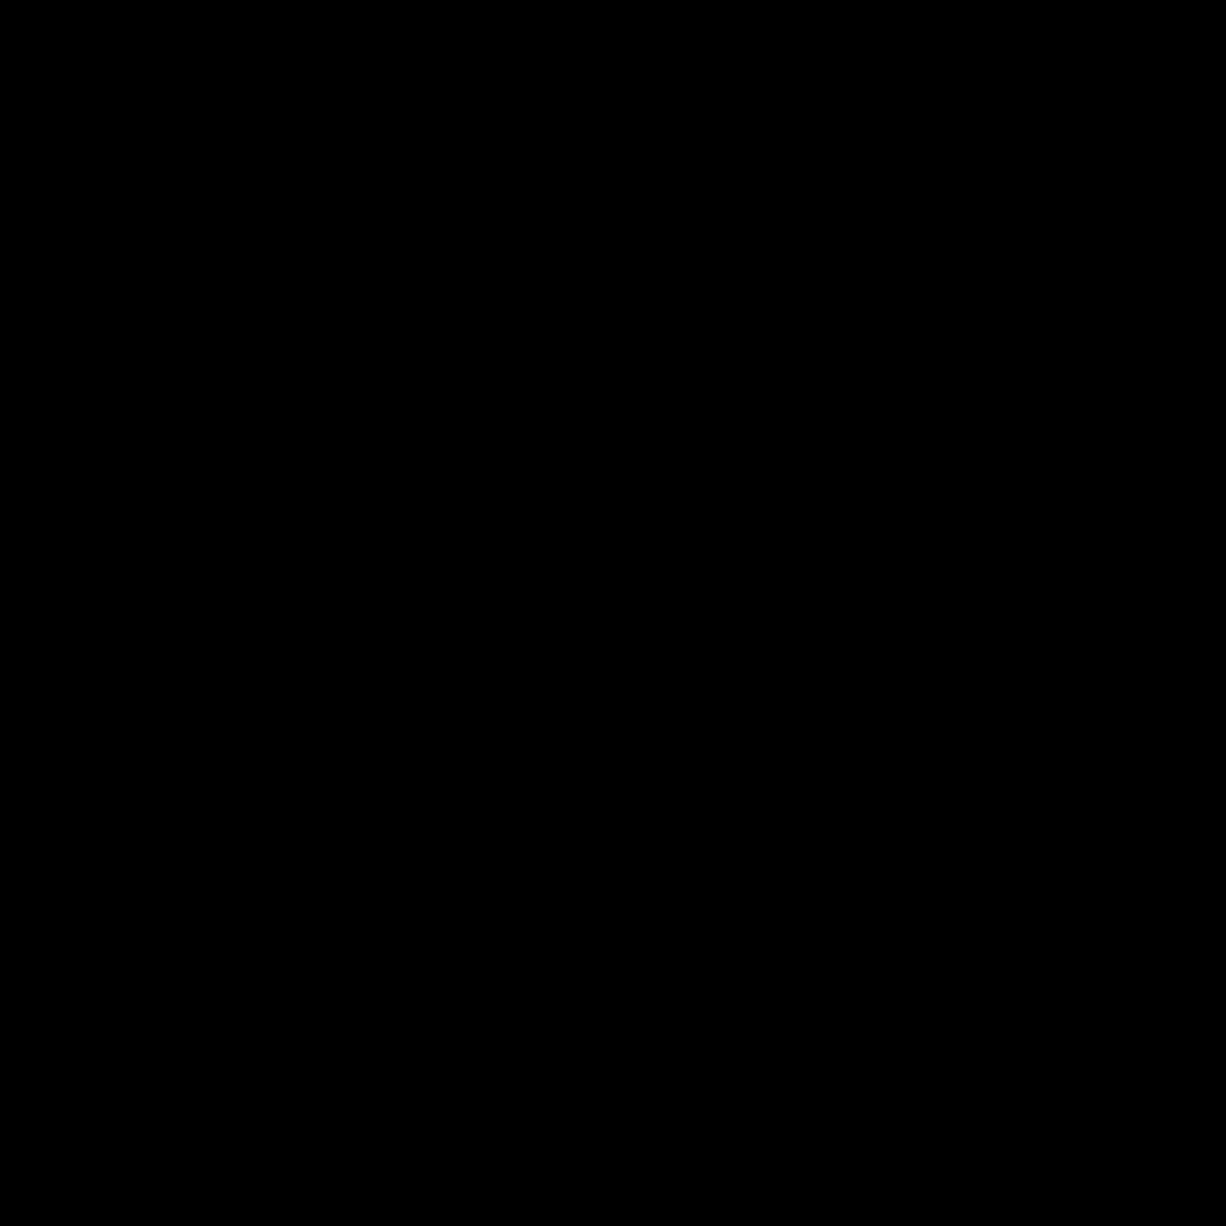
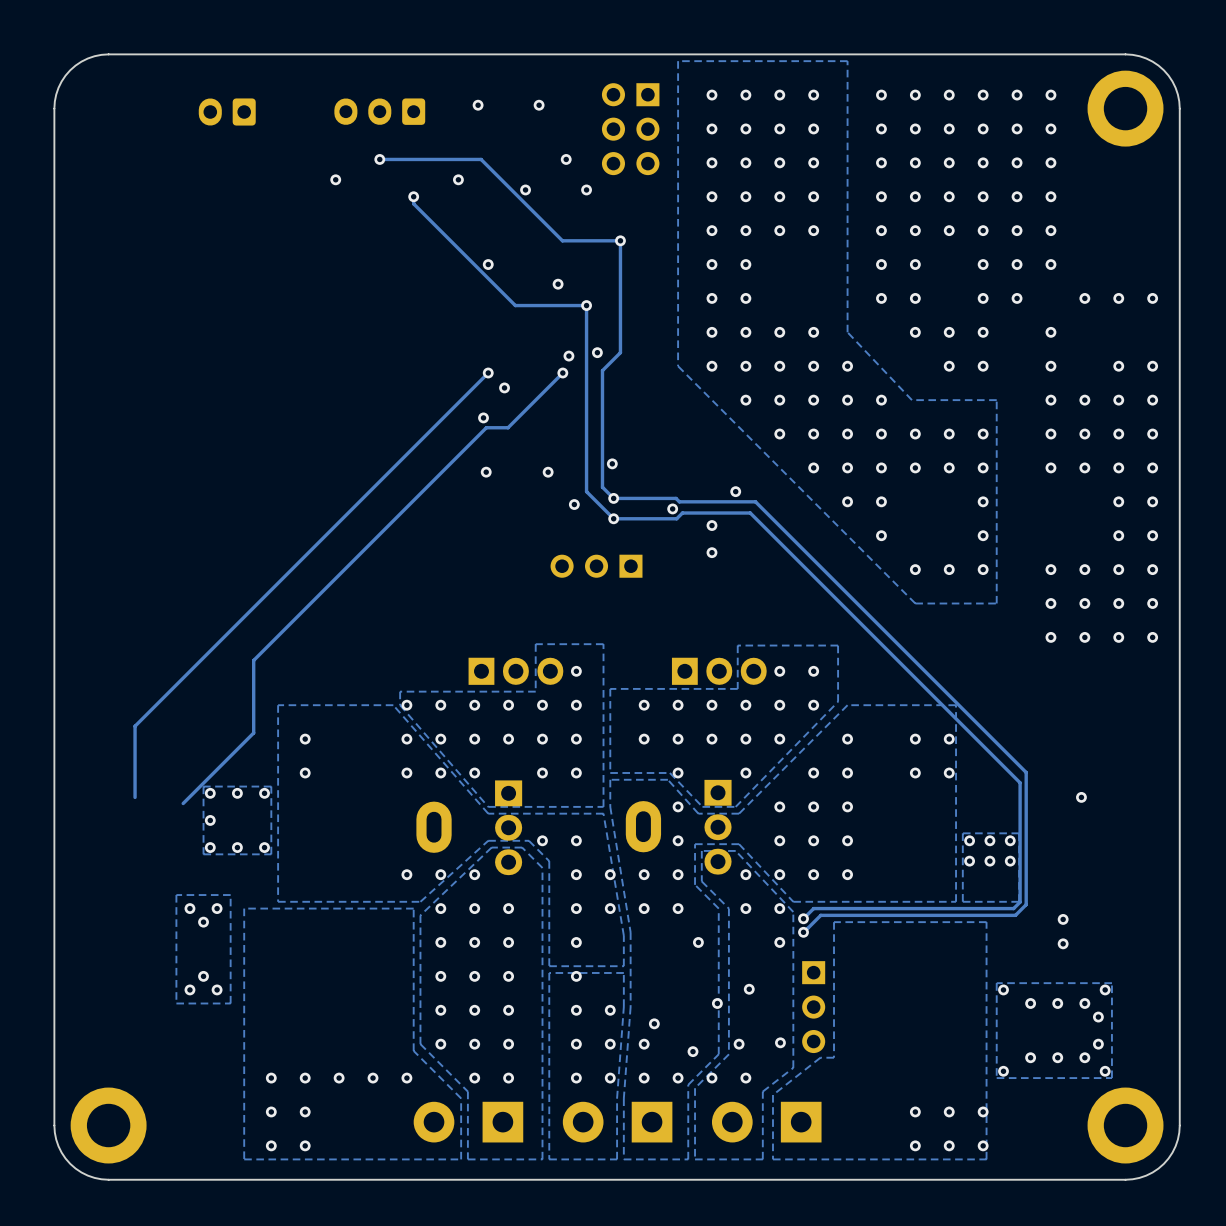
board edge: none -> (1125, 54) (108, 54) (87, 58) (70, 70) (58, 87) (54, 108) (54, 1125) (58, 1146) (70, 1163) (87, 1175) (108, 1179) (1125, 1179) (1146, 1175) (1163, 1163) (1175, 1146) (1179, 1125) (1179, 108) (1175, 87) (1163, 70) (1146, 58) (1125, 54)
zone outline: none -> (847, 61) (847, 332) (911, 400) (996, 400) (996, 603) (915, 603) (678, 366) (678, 61) (847, 61)
via: none -> (711, 95)
via: none -> (745, 95)
via: none -> (779, 95)
via: none -> (813, 95)
via: none -> (881, 95)
via: none -> (915, 95)
via: none -> (949, 95)
via: none -> (983, 95)
via: none -> (1017, 95)
via: none -> (1050, 95)
via: none -> (478, 105)
via: none -> (539, 105)
part: none -> (1125, 108)
part: none -> (379, 111)
part: none -> (227, 112)
via: none -> (711, 128)
via: none -> (745, 128)
via: none -> (779, 128)
via: none -> (813, 128)
via: none -> (881, 128)
via: none -> (915, 128)
via: none -> (949, 128)
via: none -> (983, 128)
via: none -> (1017, 128)
via: none -> (1050, 128)
part: none -> (630, 129)
track: none -> (379, 159) (481, 159) (562, 240) (620, 240) (620, 352) (602, 370) (602, 487) (613, 498) (676, 498) (679, 501) (755, 501) (1026, 772) (1026, 904) (1015, 915) (820, 915) (803, 932)
via: none -> (379, 159)
via: none -> (566, 159)
via: none -> (711, 162)
via: none -> (745, 162)
via: none -> (779, 162)
via: none -> (813, 162)
via: none -> (881, 162)
via: none -> (915, 162)
via: none -> (949, 162)
via: none -> (983, 162)
via: none -> (1017, 162)
via: none -> (1050, 162)
via: none -> (335, 179)
via: none -> (458, 179)
via: none -> (525, 189)
via: none -> (586, 189)
track: none -> (413, 196) (413, 203) (515, 305) (586, 305) (586, 491) (613, 518) (676, 518) (682, 513) (750, 513) (1020, 782) (1020, 902) (1013, 908) (813, 908) (803, 918)
via: none -> (413, 196)
via: none -> (711, 196)
via: none -> (745, 196)
via: none -> (779, 196)
via: none -> (813, 196)
via: none -> (881, 196)
via: none -> (915, 196)
via: none -> (949, 196)
via: none -> (983, 196)
via: none -> (1017, 196)
via: none -> (1050, 196)
via: none -> (711, 230)
via: none -> (745, 230)
via: none -> (779, 230)
via: none -> (813, 230)
via: none -> (881, 230)
via: none -> (915, 230)
via: none -> (949, 230)
via: none -> (983, 230)
via: none -> (1017, 230)
via: none -> (1050, 230)
via: none -> (620, 240)
via: none -> (488, 264)
via: none -> (711, 264)
via: none -> (745, 264)
via: none -> (881, 264)
via: none -> (915, 264)
via: none -> (983, 264)
via: none -> (1017, 264)
via: none -> (1050, 264)
via: none -> (558, 284)
via: none -> (711, 298)
via: none -> (745, 298)
via: none -> (881, 298)
via: none -> (915, 298)
via: none -> (983, 298)
via: none -> (1017, 298)
via: none -> (1084, 298)
via: none -> (1118, 298)
via: none -> (1152, 298)
via: none -> (586, 305)
via: none -> (711, 332)
via: none -> (745, 332)
via: none -> (779, 332)
via: none -> (813, 332)
via: none -> (915, 332)
via: none -> (949, 332)
via: none -> (983, 332)
via: none -> (1050, 332)
via: none -> (597, 352)
via: none -> (568, 356)
via: none -> (711, 366)
via: none -> (745, 366)
via: none -> (779, 366)
via: none -> (813, 366)
via: none -> (847, 366)
via: none -> (949, 366)
via: none -> (983, 366)
via: none -> (1050, 366)
via: none -> (1118, 366)
via: none -> (1152, 366)
track: none -> (488, 373) (135, 726) (135, 797)
via: none -> (488, 373)
track: none -> (562, 373) (508, 427) (486, 427) (253, 660) (253, 732) (183, 803)
via: none -> (562, 373)
via: none -> (504, 387)
via: none -> (745, 400)
via: none -> (779, 400)
via: none -> (813, 400)
via: none -> (847, 400)
via: none -> (881, 400)
via: none -> (1050, 400)
via: none -> (1084, 400)
via: none -> (1118, 400)
via: none -> (1152, 400)
via: none -> (483, 417)
via: none -> (779, 434)
via: none -> (813, 434)
via: none -> (847, 434)
via: none -> (881, 434)
via: none -> (915, 434)
via: none -> (949, 434)
via: none -> (983, 434)
via: none -> (1050, 434)
via: none -> (1084, 434)
via: none -> (1118, 434)
via: none -> (1152, 434)
via: none -> (612, 463)
via: none -> (813, 467)
via: none -> (847, 467)
via: none -> (881, 467)
via: none -> (915, 467)
via: none -> (949, 467)
via: none -> (983, 467)
via: none -> (1050, 467)
via: none -> (1084, 467)
via: none -> (1118, 467)
via: none -> (1152, 467)
via: none -> (486, 472)
via: none -> (548, 472)
via: none -> (735, 491)
via: none -> (613, 498)
via: none -> (847, 501)
via: none -> (881, 501)
via: none -> (983, 501)
via: none -> (1118, 501)
via: none -> (1152, 501)
via: none -> (574, 504)
via: none -> (672, 508)
via: none -> (613, 518)
via: none -> (711, 525)
via: none -> (881, 535)
via: none -> (983, 535)
via: none -> (1118, 535)
via: none -> (1152, 535)
via: none -> (711, 552)
part: none -> (596, 566)
via: none -> (915, 569)
via: none -> (949, 569)
via: none -> (983, 569)
via: none -> (1050, 569)
via: none -> (1084, 569)
via: none -> (1118, 569)
via: none -> (1152, 569)
via: none -> (1050, 603)
via: none -> (1084, 603)
via: none -> (1118, 603)
via: none -> (1152, 603)
via: none -> (1050, 637)
via: none -> (1084, 637)
via: none -> (1118, 637)
via: none -> (1152, 637)
zone outline: none -> (603, 644) (603, 806) (488, 806) (400, 705) (400, 691) (535, 691) (535, 644) (603, 644)
zone outline: none -> (838, 645) (838, 701) (735, 806) (702, 806) (669, 772) (610, 772) (610, 688) (737, 688) (737, 645) (838, 645)
part: none -> (515, 671)
via: none -> (576, 671)
part: none -> (719, 671)
via: none -> (779, 671)
via: none -> (813, 671)
zone outline: none -> (393, 705) (278, 705) (278, 901) (420, 901) (488, 840) (528, 840) (549, 861) (549, 966) (623, 966) (623, 935) (603, 813) (488, 813) (393, 705)
via: none -> (406, 705)
via: none -> (440, 705)
via: none -> (474, 705)
via: none -> (508, 705)
via: none -> (542, 705)
via: none -> (576, 705)
via: none -> (644, 705)
via: none -> (678, 705)
via: none -> (711, 705)
via: none -> (745, 705)
via: none -> (779, 705)
via: none -> (813, 705)
zone outline: none -> (956, 705) (956, 901) (793, 901) (739, 844) (695, 844) (695, 884) (718, 908) (718, 1054) (688, 1084) (688, 1159) (623, 1159) (623, 1098) (630, 1006) (630, 932) (610, 806) (610, 779) (667, 779) (698, 813) (739, 813) (847, 705) (956, 705)
via: none -> (305, 739)
via: none -> (406, 739)
via: none -> (440, 739)
via: none -> (474, 739)
via: none -> (508, 739)
via: none -> (542, 739)
via: none -> (576, 739)
via: none -> (644, 739)
via: none -> (678, 739)
via: none -> (711, 739)
via: none -> (745, 739)
via: none -> (779, 739)
via: none -> (847, 739)
via: none -> (915, 739)
via: none -> (949, 739)
via: none -> (305, 772)
via: none -> (406, 772)
via: none -> (440, 772)
via: none -> (474, 772)
via: none -> (542, 772)
via: none -> (576, 772)
via: none -> (678, 772)
via: none -> (745, 772)
via: none -> (813, 772)
via: none -> (847, 772)
via: none -> (915, 772)
via: none -> (949, 772)
zone outline: none -> (271, 786) (271, 854) (203, 854) (203, 786) (271, 786)
via: none -> (210, 793)
via: none -> (237, 793)
via: none -> (264, 793)
via: none -> (1081, 797)
via: none -> (678, 806)
via: none -> (779, 806)
via: none -> (813, 806)
via: none -> (847, 806)
via: none -> (210, 820)
part: none -> (643, 826)
part: none -> (434, 827)
part: none -> (508, 827)
part: none -> (718, 827)
zone outline: none -> (1019, 833) (1019, 901) (962, 901) (962, 833) (1019, 833)
via: none -> (542, 840)
via: none -> (576, 840)
via: none -> (678, 840)
via: none -> (779, 840)
via: none -> (813, 840)
via: none -> (847, 840)
via: none -> (969, 840)
via: none -> (989, 840)
via: none -> (1010, 840)
via: none -> (210, 847)
via: none -> (237, 847)
via: none -> (264, 847)
zone outline: none -> (522, 847) (542, 867) (542, 1159) (467, 1159) (467, 1091) (420, 1044) (420, 915) (491, 847) (522, 847)
zone outline: none -> (735, 850) (793, 911) (793, 1067) (762, 1091) (762, 1159) (695, 1159) (695, 1088) (728, 1054) (728, 908) (701, 881) (701, 850) (735, 850)
via: none -> (969, 861)
via: none -> (989, 861)
via: none -> (1010, 861)
via: none -> (406, 874)
via: none -> (440, 874)
via: none -> (474, 874)
via: none -> (576, 874)
via: none -> (610, 874)
via: none -> (644, 874)
via: none -> (678, 874)
via: none -> (745, 874)
via: none -> (779, 874)
via: none -> (813, 874)
via: none -> (847, 874)
zone outline: none -> (230, 895) (230, 1003) (176, 1003) (176, 895) (230, 895)
via: none -> (189, 908)
via: none -> (217, 908)
zone outline: none -> (413, 908) (413, 1050) (461, 1098) (461, 1159) (244, 1159) (244, 908) (413, 908)
via: none -> (440, 908)
via: none -> (474, 908)
via: none -> (508, 908)
via: none -> (576, 908)
via: none -> (610, 908)
via: none -> (644, 908)
via: none -> (678, 908)
via: none -> (745, 908)
via: none -> (779, 908)
via: none -> (803, 918)
via: none -> (1063, 919)
via: none -> (203, 922)
zone outline: none -> (986, 922) (986, 1159) (772, 1159) (772, 1095) (820, 1057) (834, 1057) (834, 922) (986, 922)
via: none -> (803, 932)
via: none -> (440, 942)
via: none -> (474, 942)
via: none -> (508, 942)
via: none -> (576, 942)
via: none -> (698, 942)
via: none -> (779, 942)
via: none -> (1063, 943)
zone outline: none -> (623, 972) (623, 1006) (617, 1098) (617, 1159) (549, 1159) (549, 972) (623, 972)
via: none -> (203, 976)
via: none -> (440, 976)
via: none -> (474, 976)
via: none -> (508, 976)
via: none -> (576, 976)
zone outline: none -> (1111, 983) (1111, 1078) (996, 1078) (996, 983) (1111, 983)
via: none -> (189, 989)
via: none -> (217, 989)
via: none -> (749, 989)
via: none -> (1003, 989)
via: none -> (1105, 989)
via: none -> (717, 1003)
via: none -> (1030, 1003)
via: none -> (1057, 1003)
via: none -> (1084, 1003)
part: none -> (813, 1007)
via: none -> (440, 1010)
via: none -> (474, 1010)
via: none -> (508, 1010)
via: none -> (576, 1010)
via: none -> (610, 1010)
via: none -> (1098, 1017)
via: none -> (654, 1023)
via: none -> (780, 1042)
via: none -> (440, 1044)
via: none -> (474, 1044)
via: none -> (508, 1044)
via: none -> (576, 1044)
via: none -> (610, 1044)
via: none -> (644, 1044)
via: none -> (739, 1044)
via: none -> (1098, 1044)
via: none -> (692, 1051)
via: none -> (1030, 1057)
via: none -> (1057, 1057)
via: none -> (1084, 1057)
via: none -> (1003, 1071)
via: none -> (1105, 1071)
via: none -> (271, 1078)
via: none -> (305, 1078)
via: none -> (339, 1078)
via: none -> (373, 1078)
via: none -> (406, 1078)
via: none -> (474, 1078)
via: none -> (508, 1078)
via: none -> (576, 1078)
via: none -> (610, 1078)
via: none -> (644, 1078)
via: none -> (678, 1078)
via: none -> (711, 1078)
via: none -> (745, 1078)
via: none -> (271, 1111)
via: none -> (305, 1111)
via: none -> (915, 1111)
via: none -> (949, 1111)
via: none -> (983, 1111)
part: none -> (468, 1122)
part: none -> (617, 1122)
part: none -> (766, 1122)
part: none -> (108, 1125)
part: none -> (1125, 1125)
via: none -> (271, 1145)
via: none -> (305, 1145)
via: none -> (915, 1145)
via: none -> (949, 1145)
via: none -> (983, 1145)

